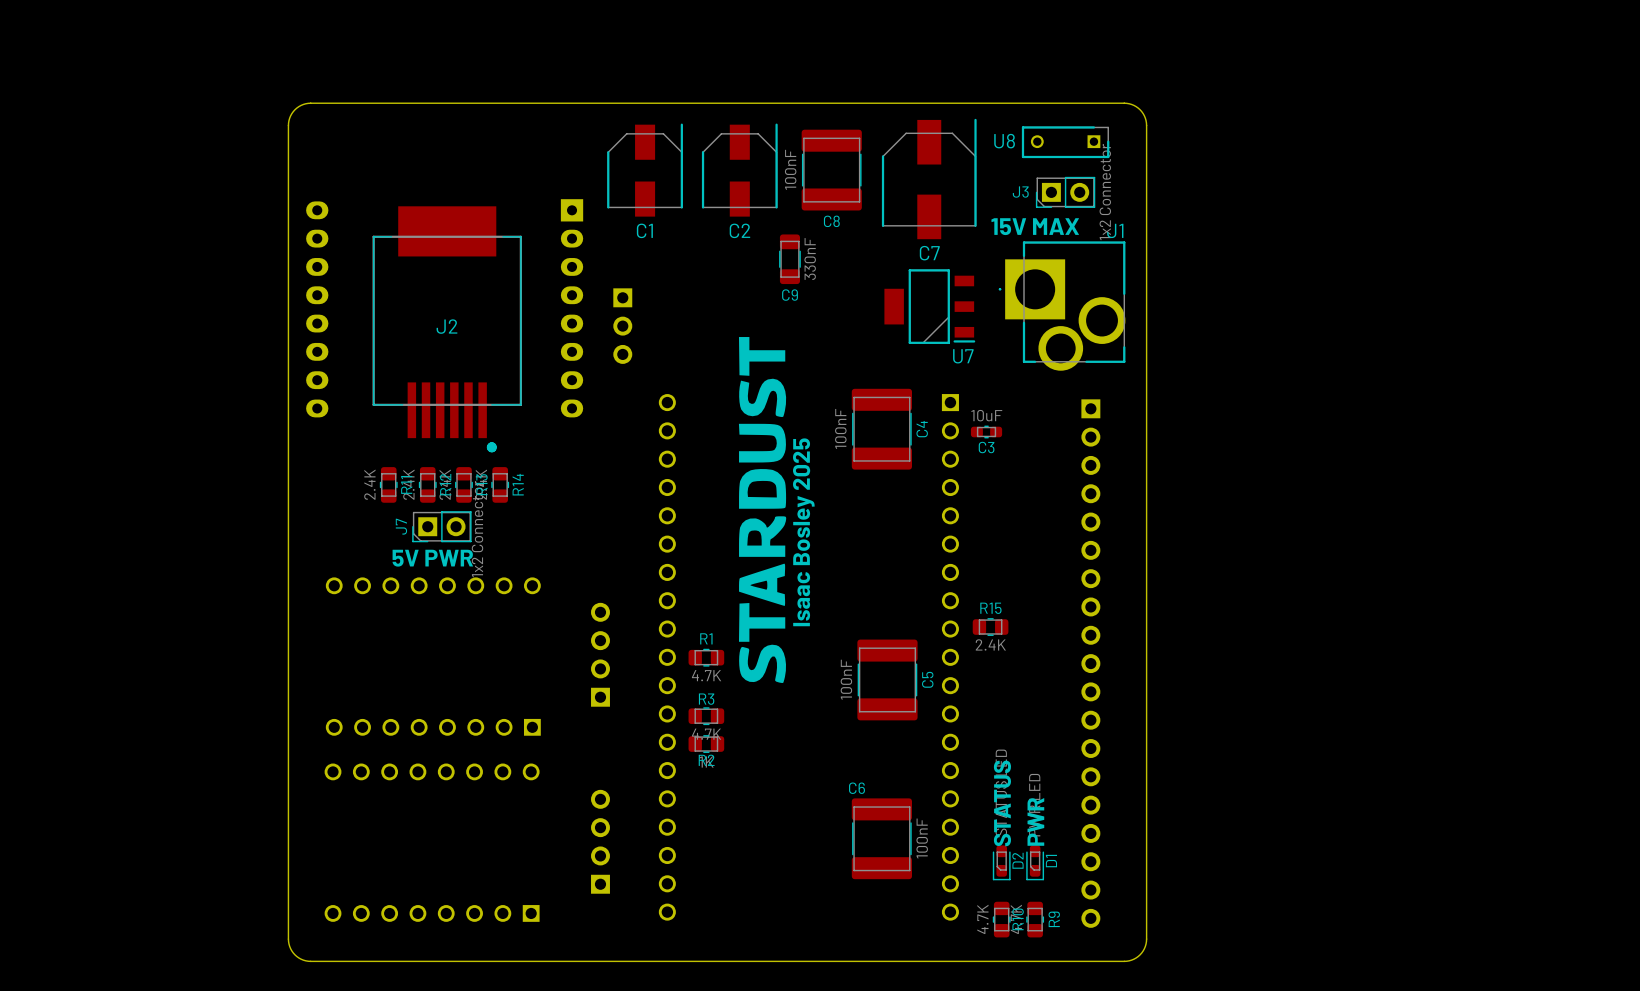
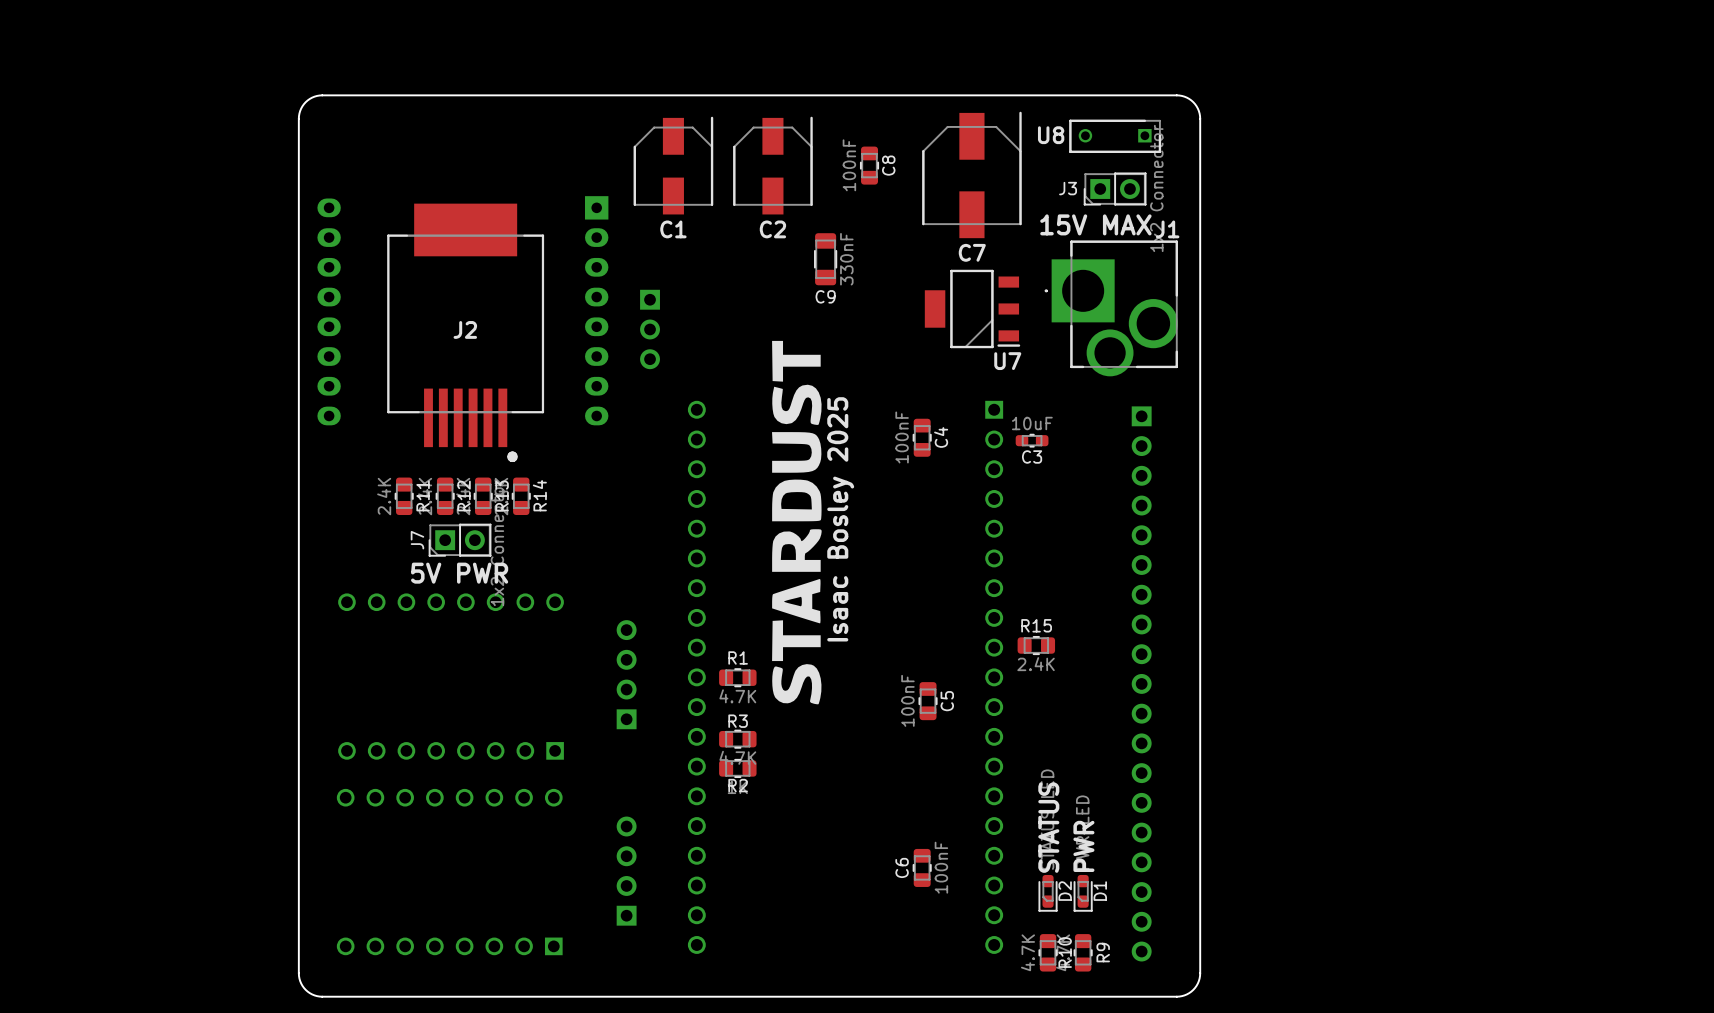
C8 footprint: [801, 129, 862, 211] -> [860, 146, 879, 185]
C8 name position: C8 (831, 221) -> C8 (888, 165)
C4 footprint: [851, 388, 912, 470] -> [912, 418, 932, 457]
C5 footprint: [857, 639, 918, 721] -> [918, 682, 938, 721]
C6 name position: C6 (857, 788) -> C6 (902, 867)
C6 footprint: [851, 798, 912, 880] -> [912, 848, 932, 887]

